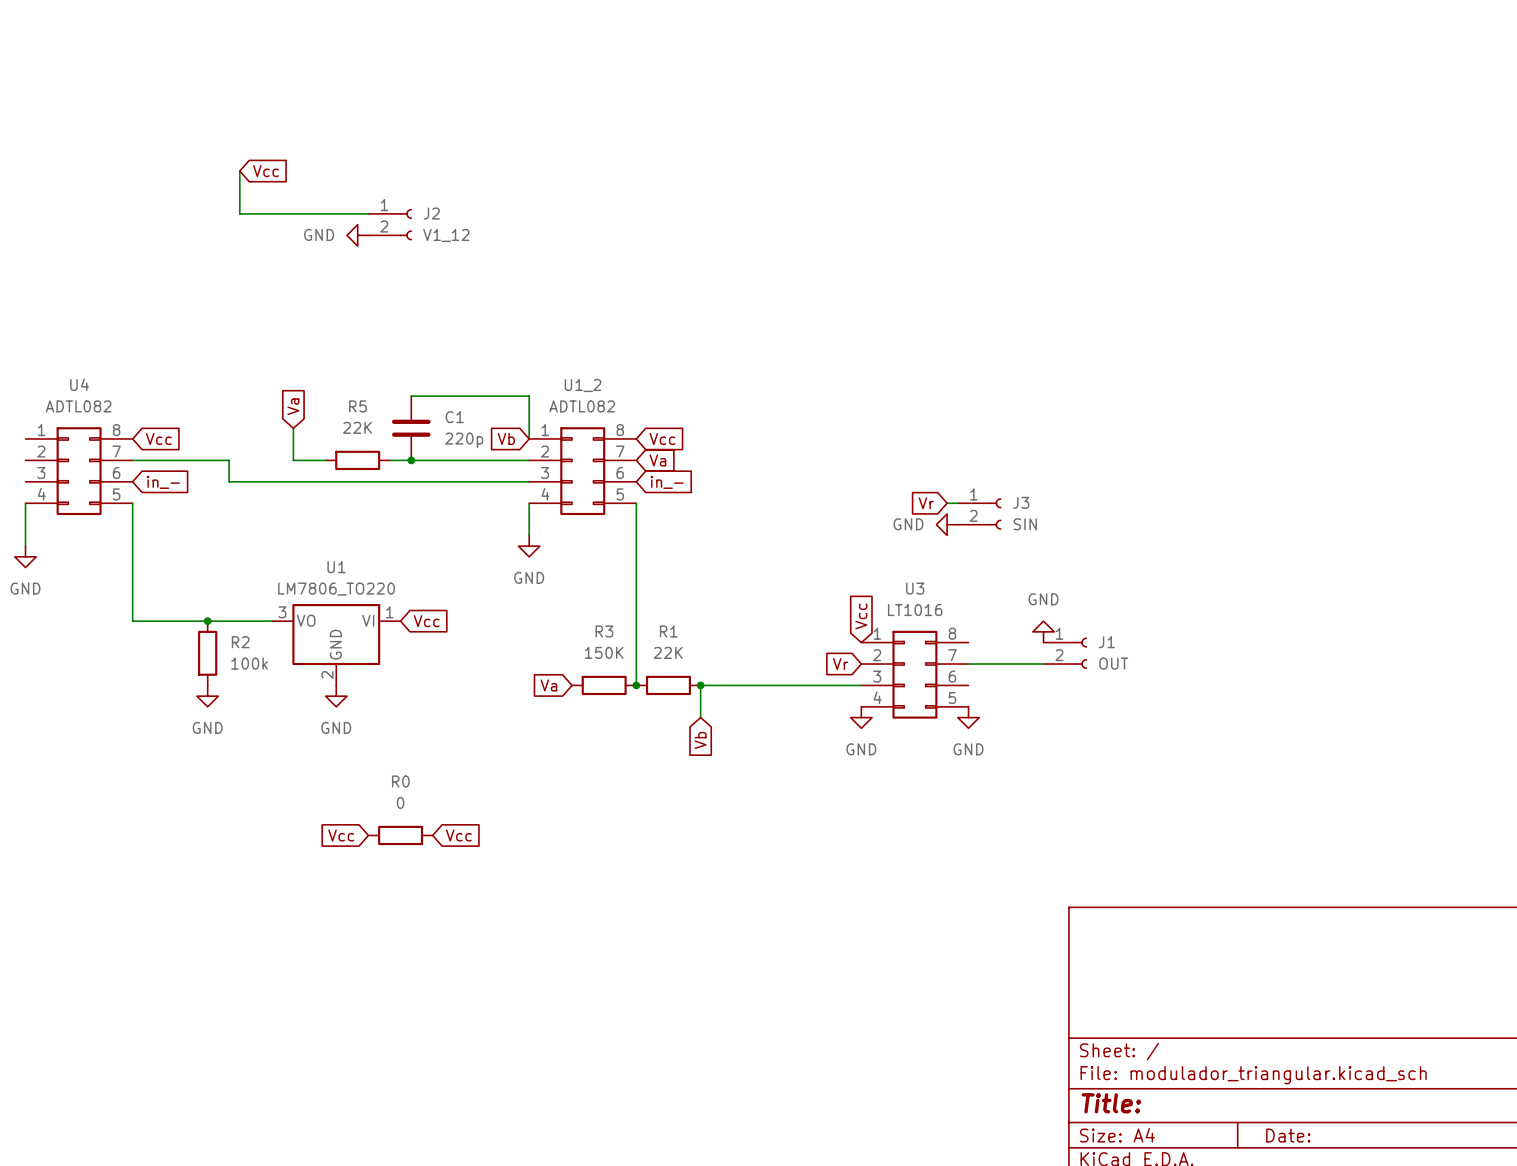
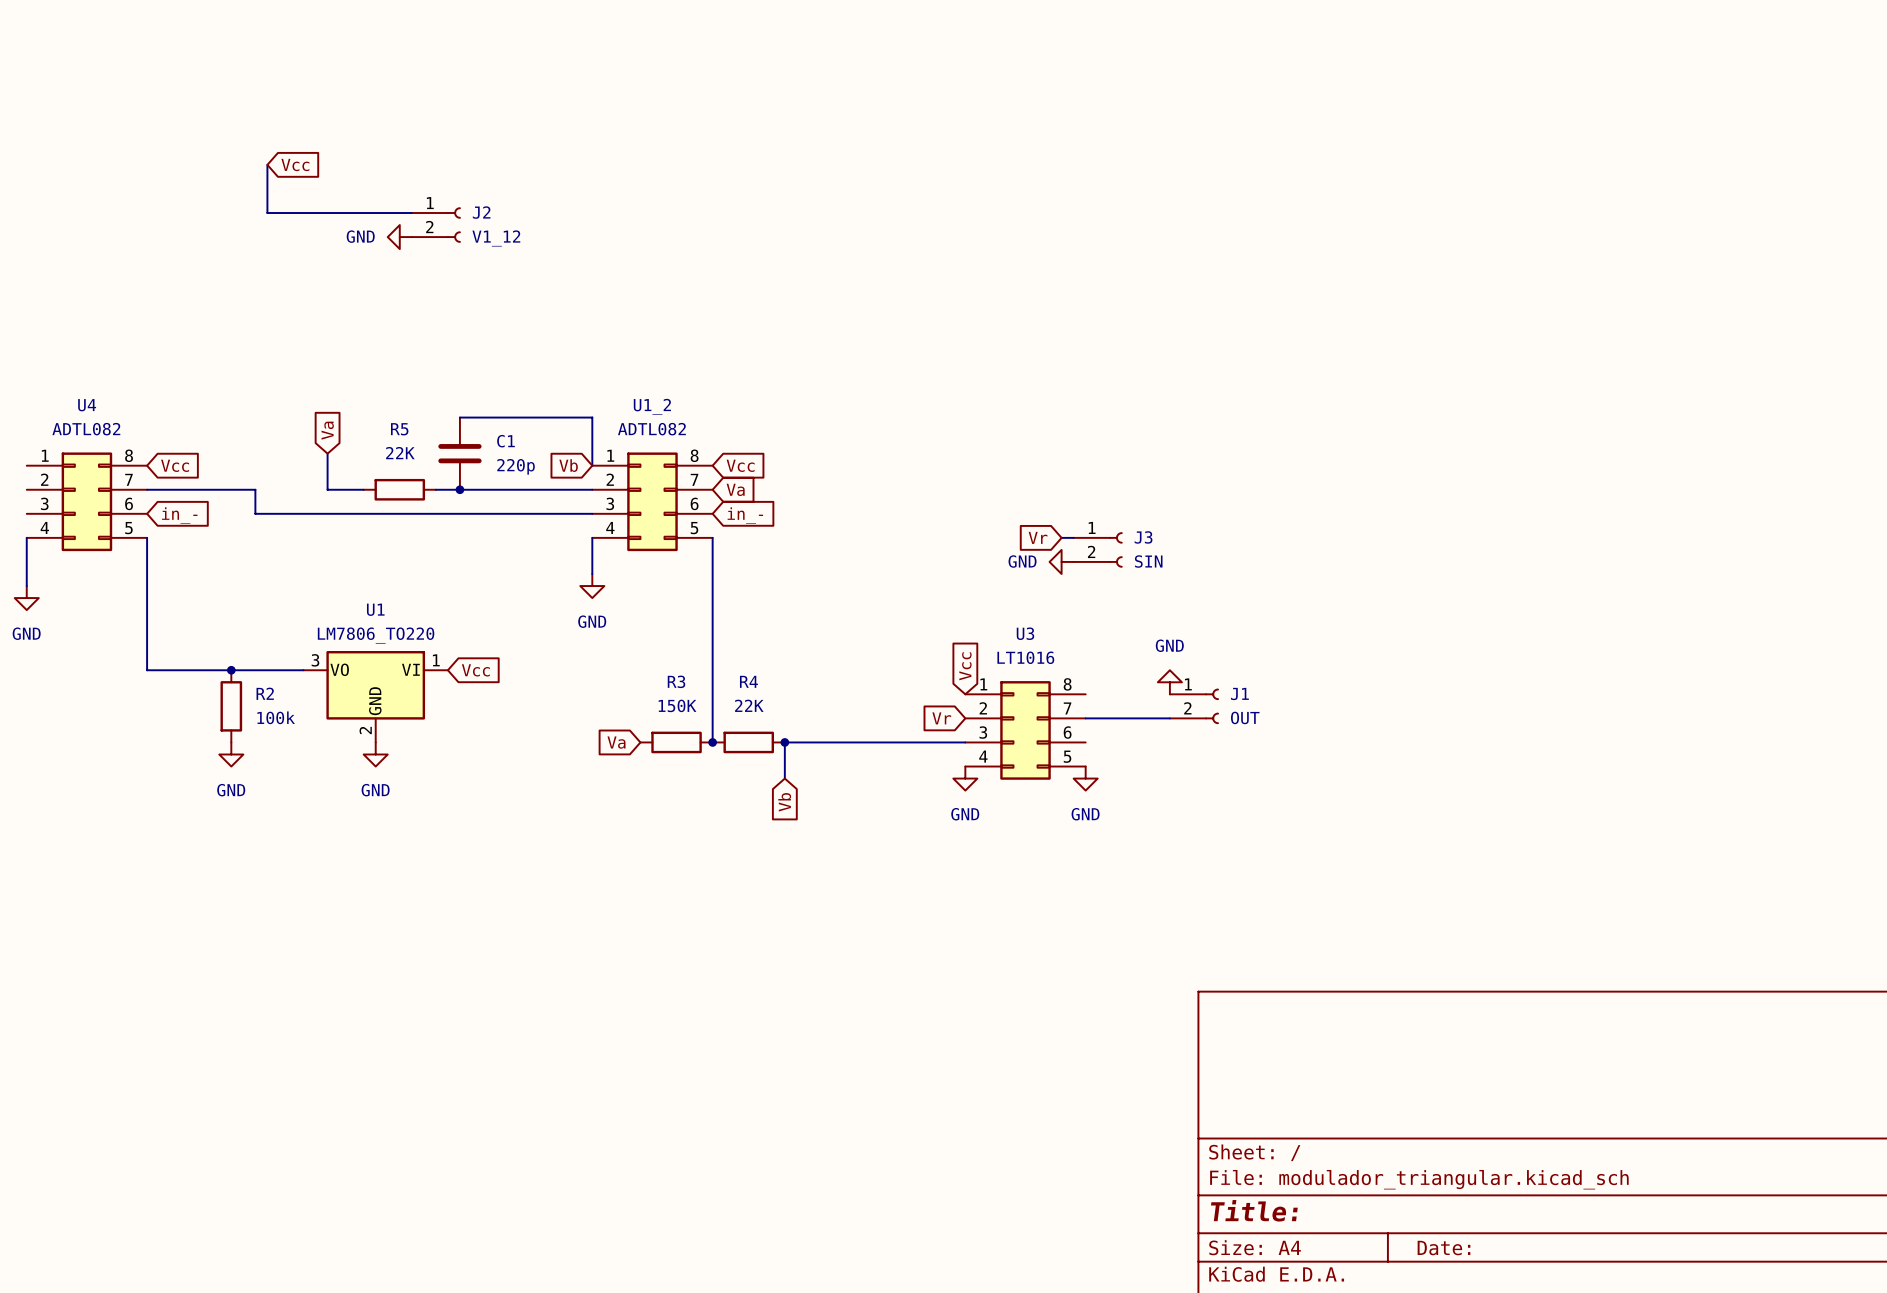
R1 name: R1 (668, 631) -> R4 (748, 681)
global label: Vcc (341, 835) -> none
R0: 0 (400, 835) -> none
global label: Vcc (458, 835) -> none

